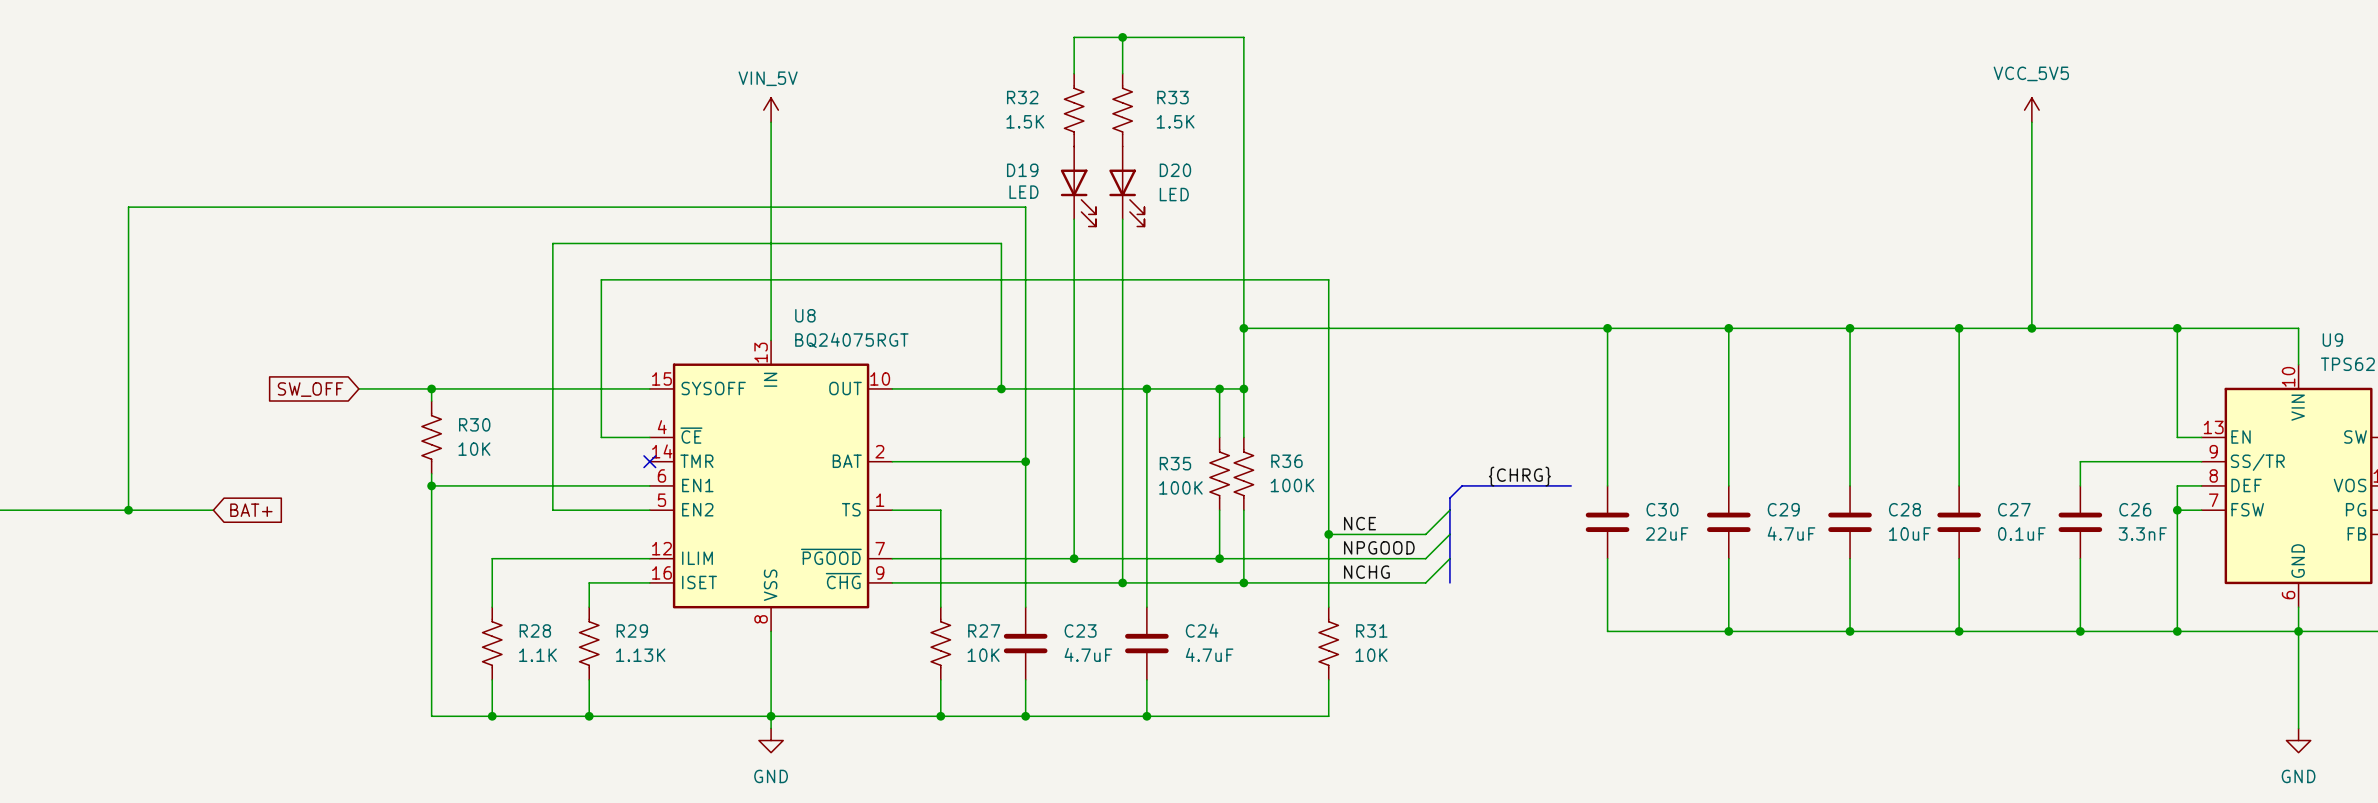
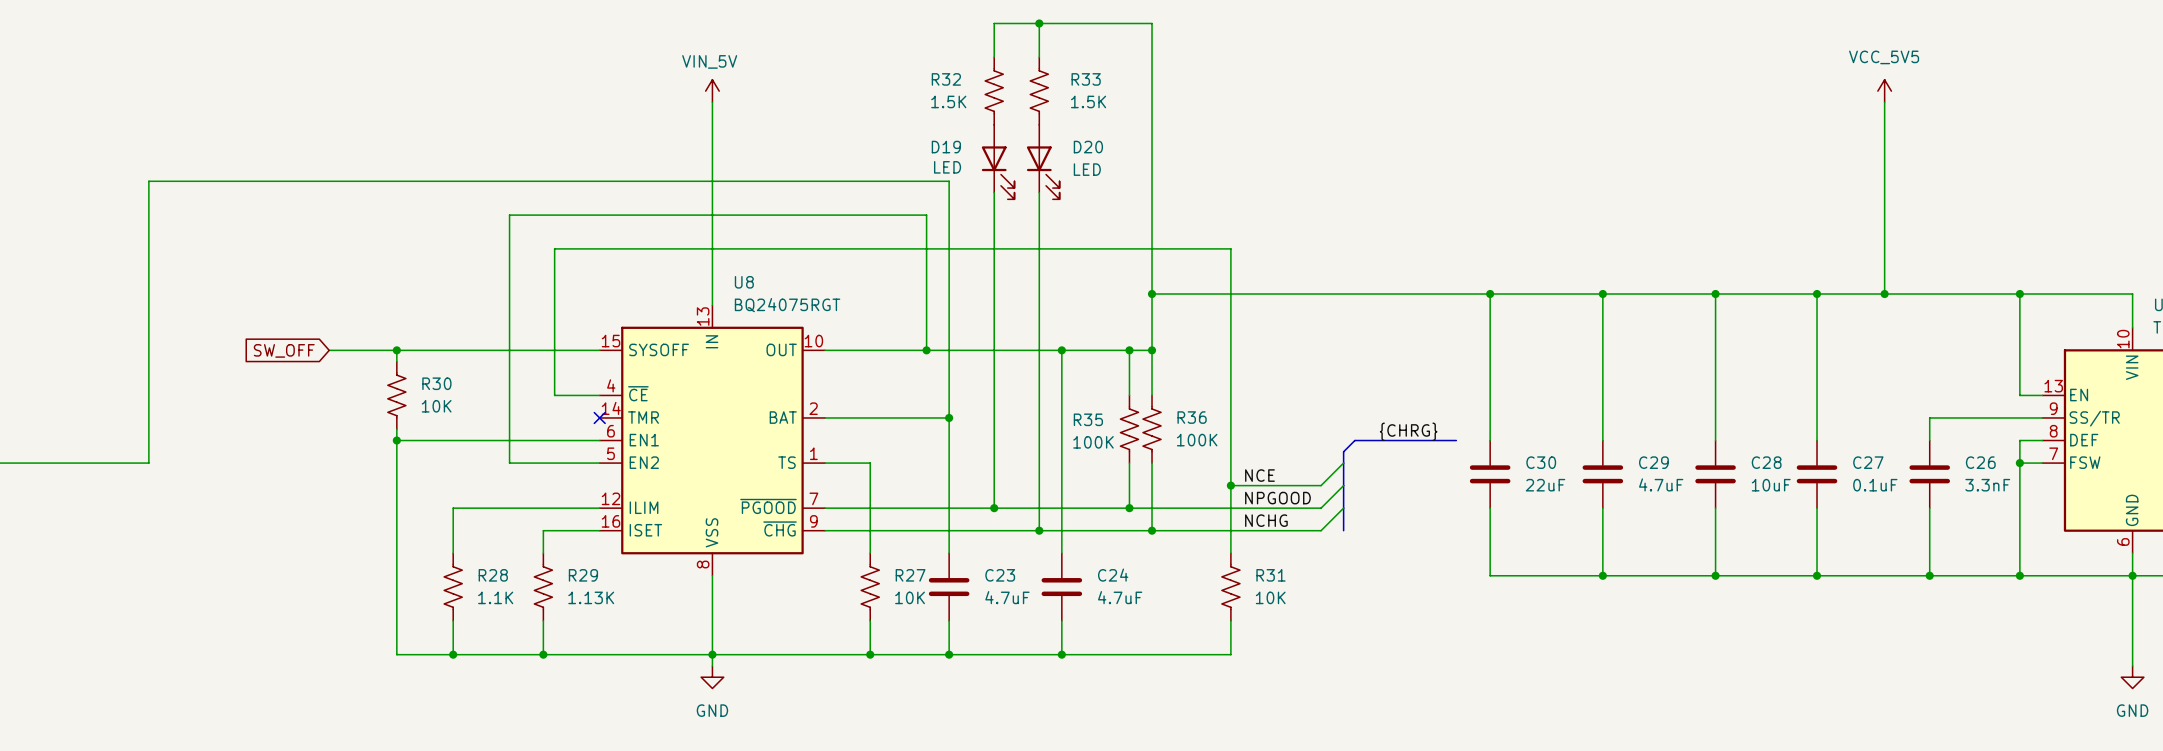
wire: (164, 207) (128, 207) (128, 510) -> (148, 181) (148, 463)
junction: (128, 510) -> none
wire: (164, 510) (213, 510) -> none
global label: BAT+ (251, 510) -> none

